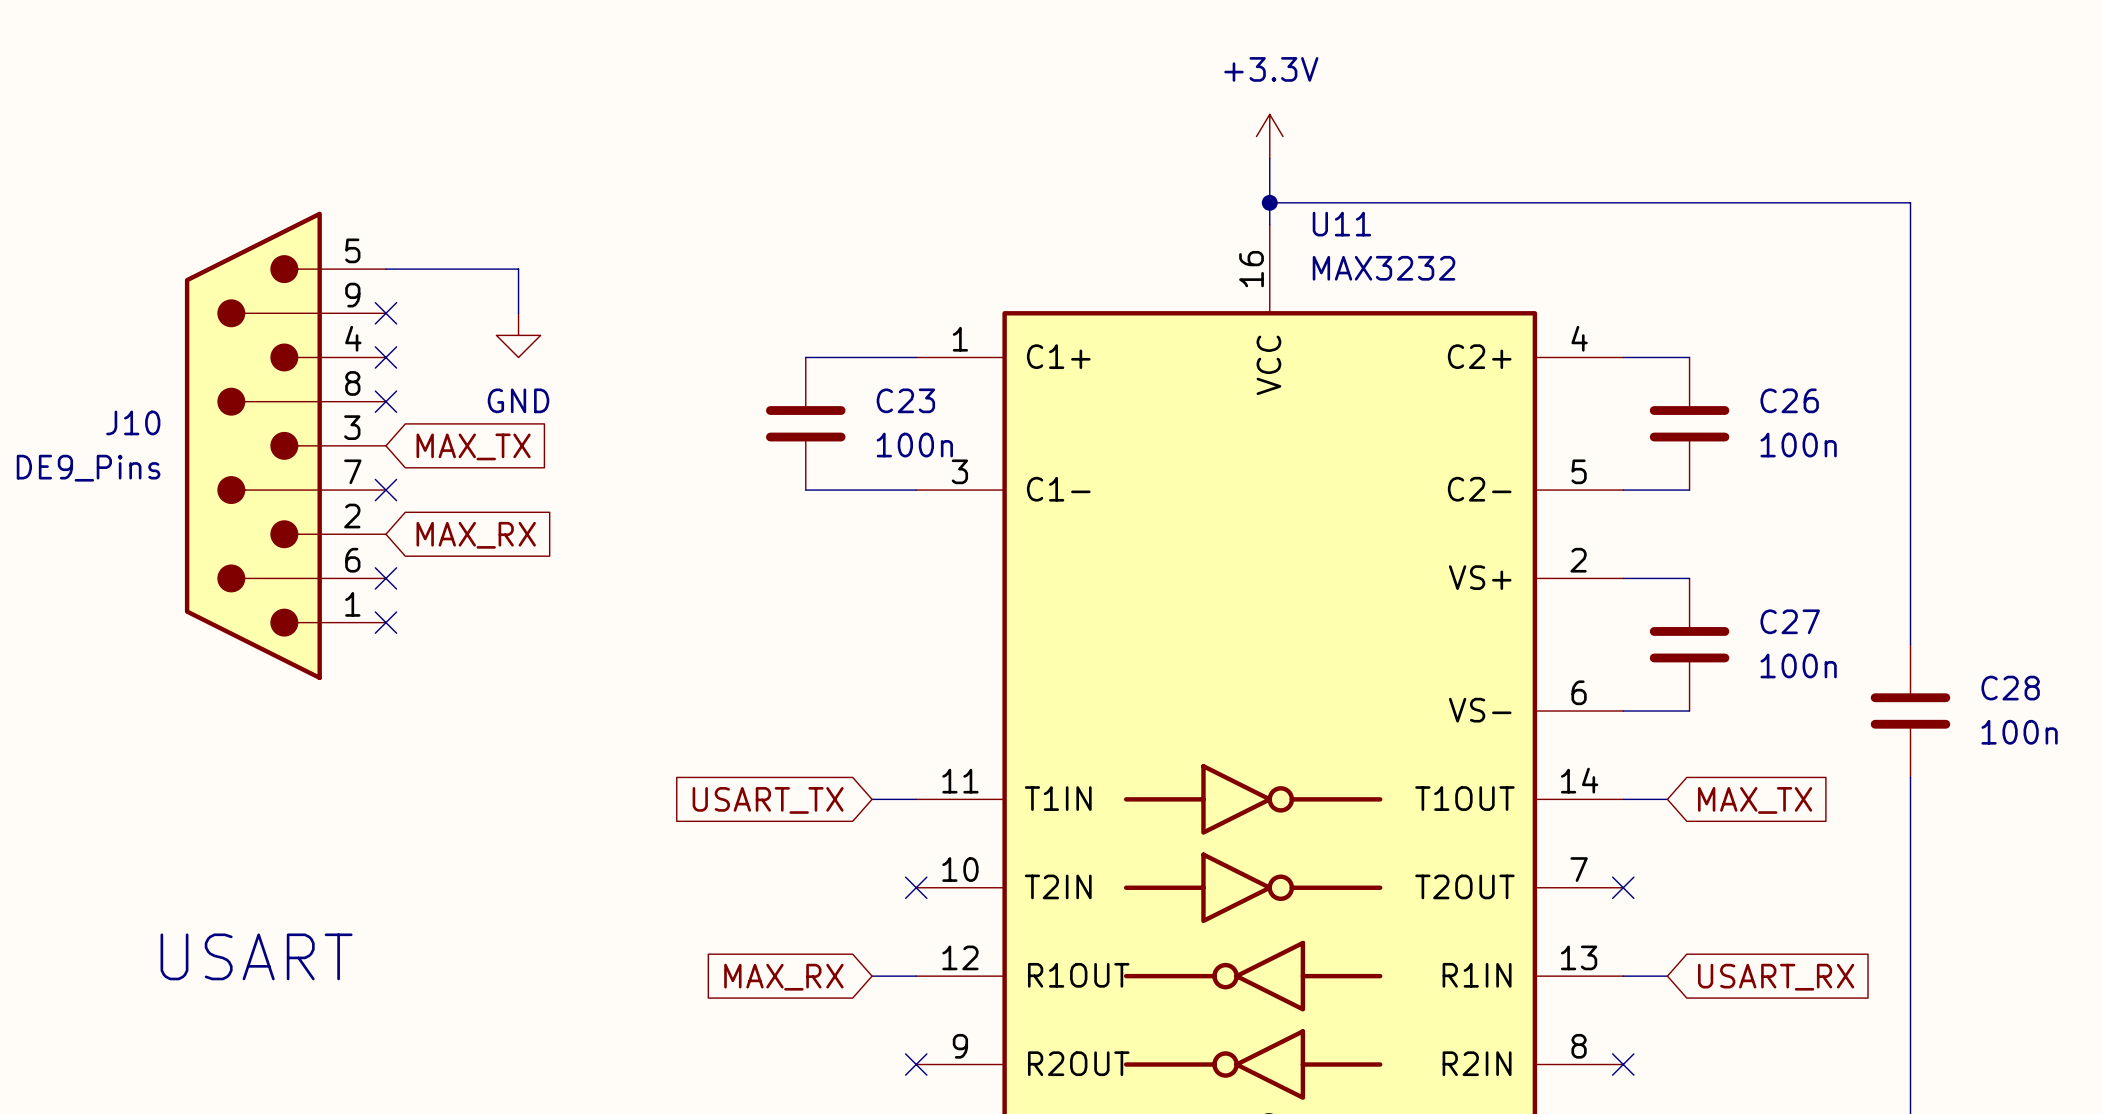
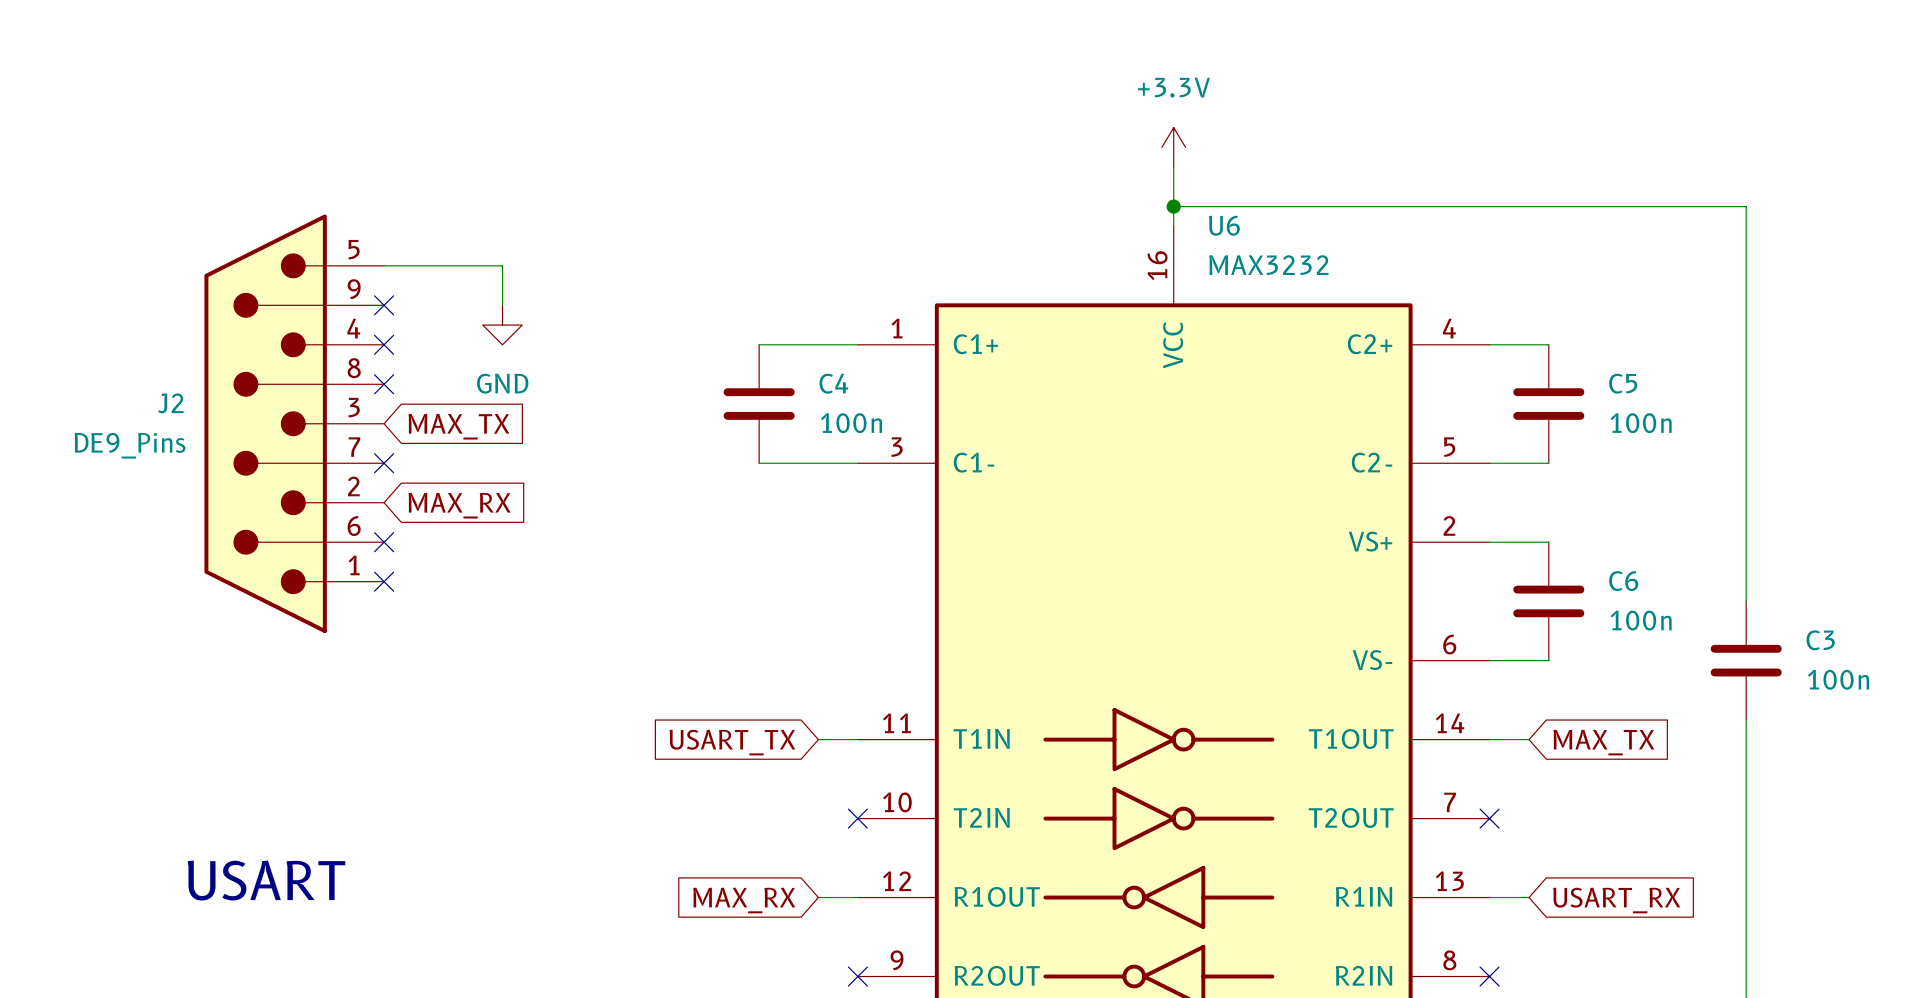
U11 name: U11 (1341, 224) -> U6 (1224, 225)
C23 name: C23 (905, 400) -> C4 (833, 383)
C26 name: C26 (1789, 400) -> C5 (1623, 383)
J10 name: J10 (133, 422) -> J2 (170, 403)
C27 name: C27 (1790, 621) -> C6 (1623, 581)
C28 name: C28 (2010, 688) -> C3 (1820, 640)

